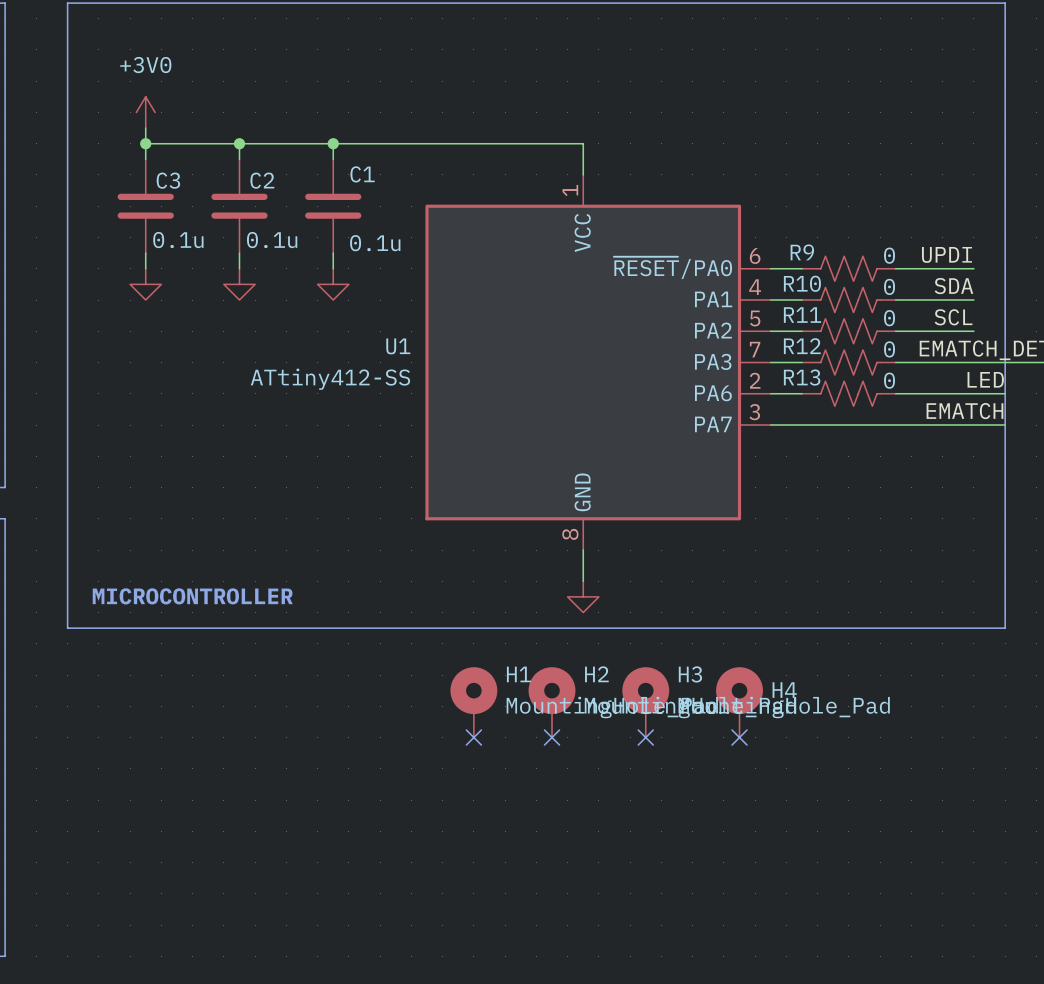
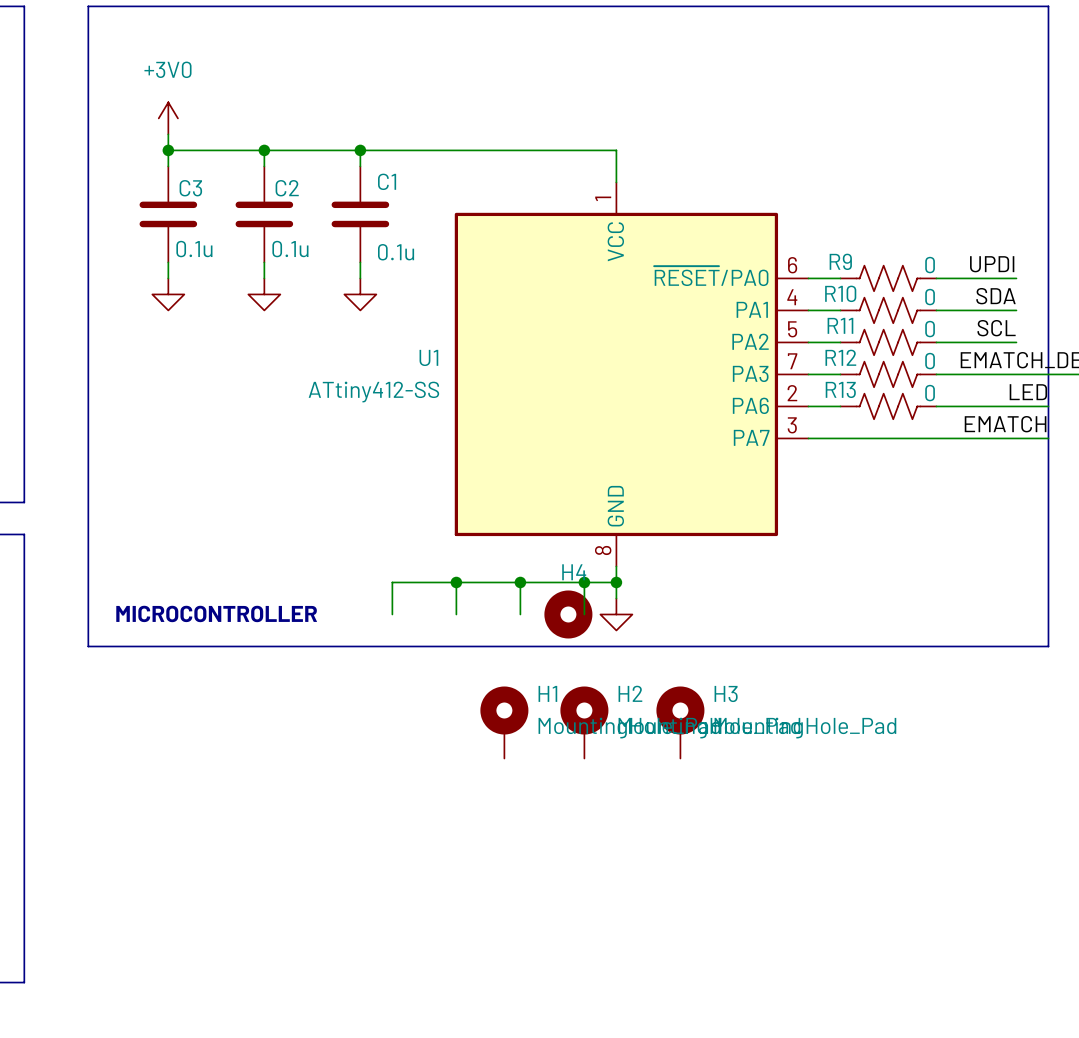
wire: none -> (456, 582) (456, 614)
junction: none -> (456, 582)
wire: none -> (520, 582) (520, 614)
junction: none -> (520, 582)
wire: none -> (584, 582) (584, 614)
junction: none -> (584, 582)
wire: none -> (616, 582) (392, 582) (392, 614)
junction: none -> (616, 582)
H4 symbol: [716, 667, 763, 738] -> [544, 590, 593, 639]
H4 name position: H4 (784, 690) -> H4 (574, 572)
no-connect mark: (473, 737) -> none
no-connect mark: (552, 737) -> none
no-connect mark: (645, 737) -> none
no-connect mark: (739, 737) -> none

